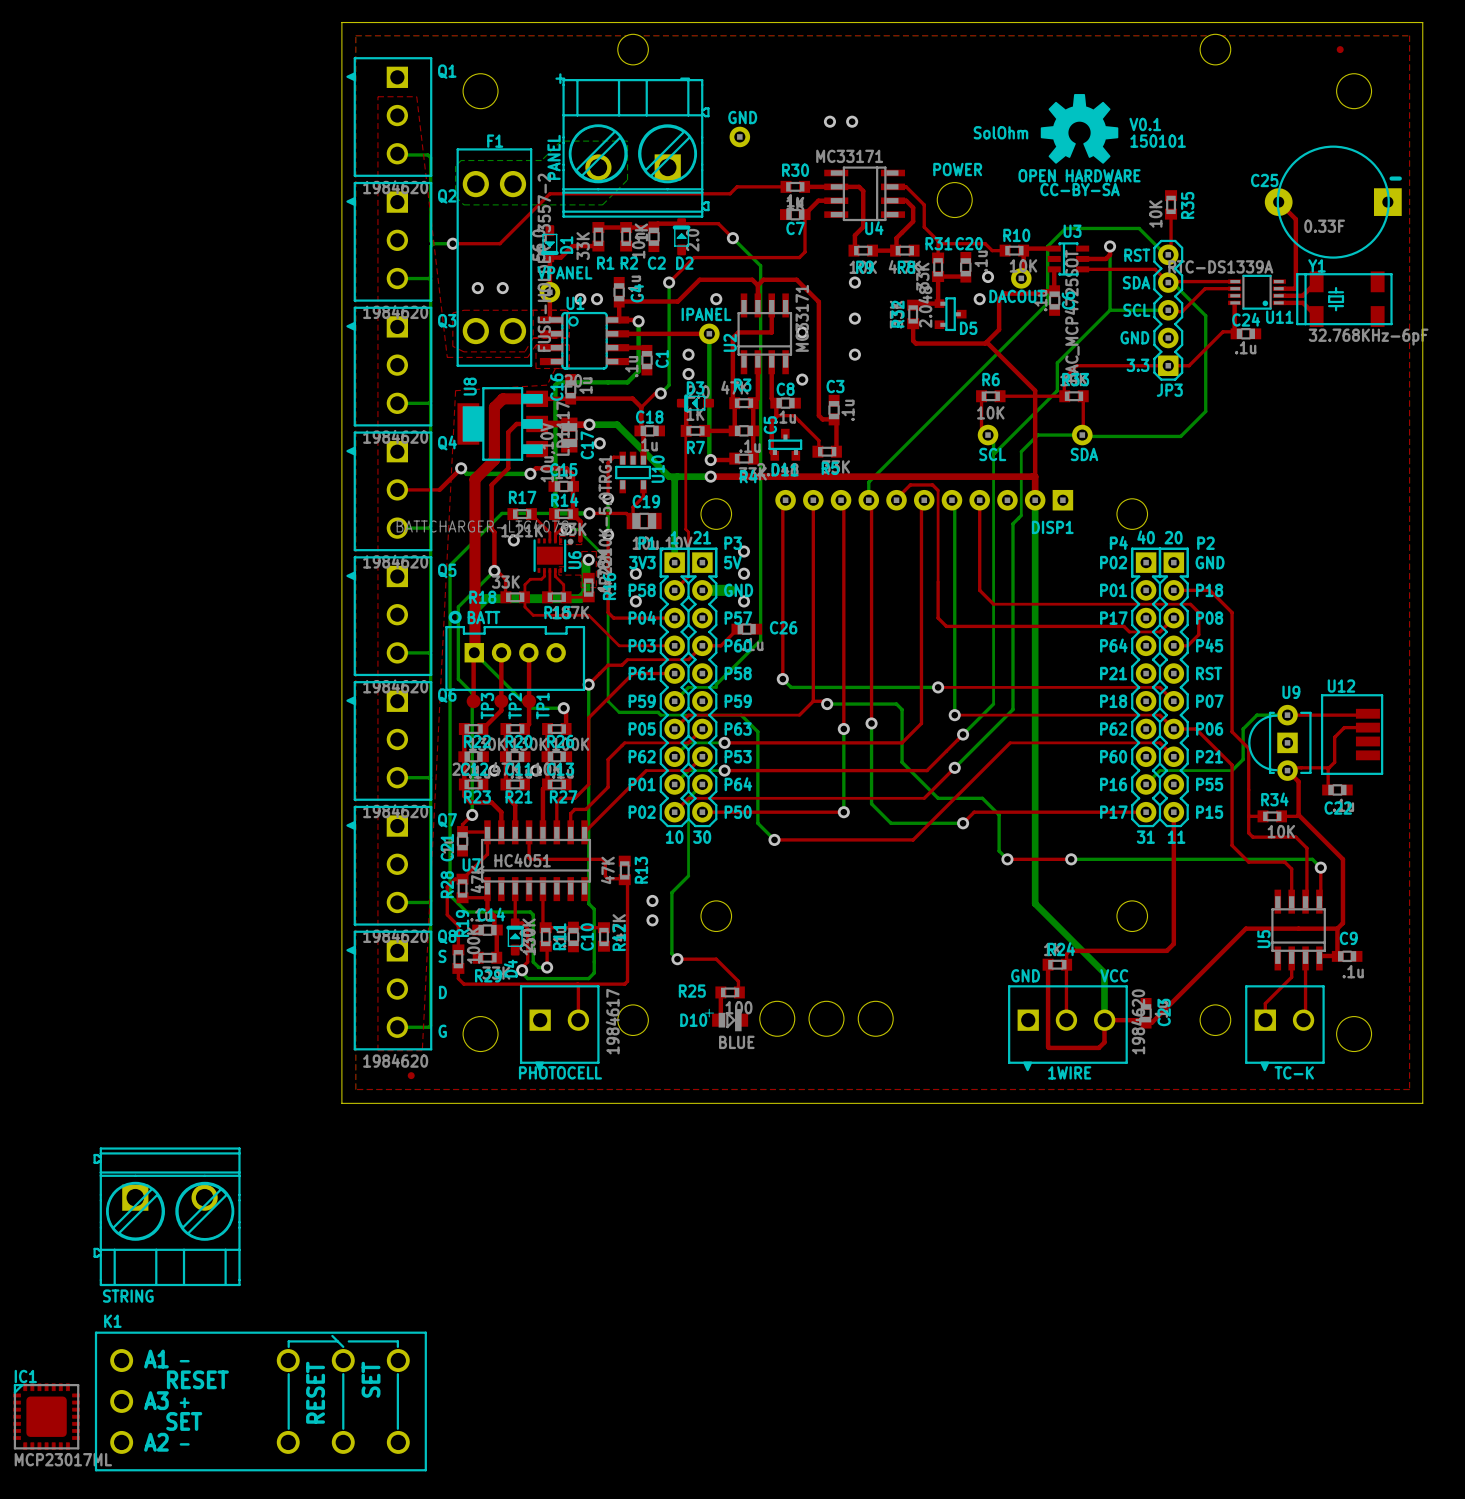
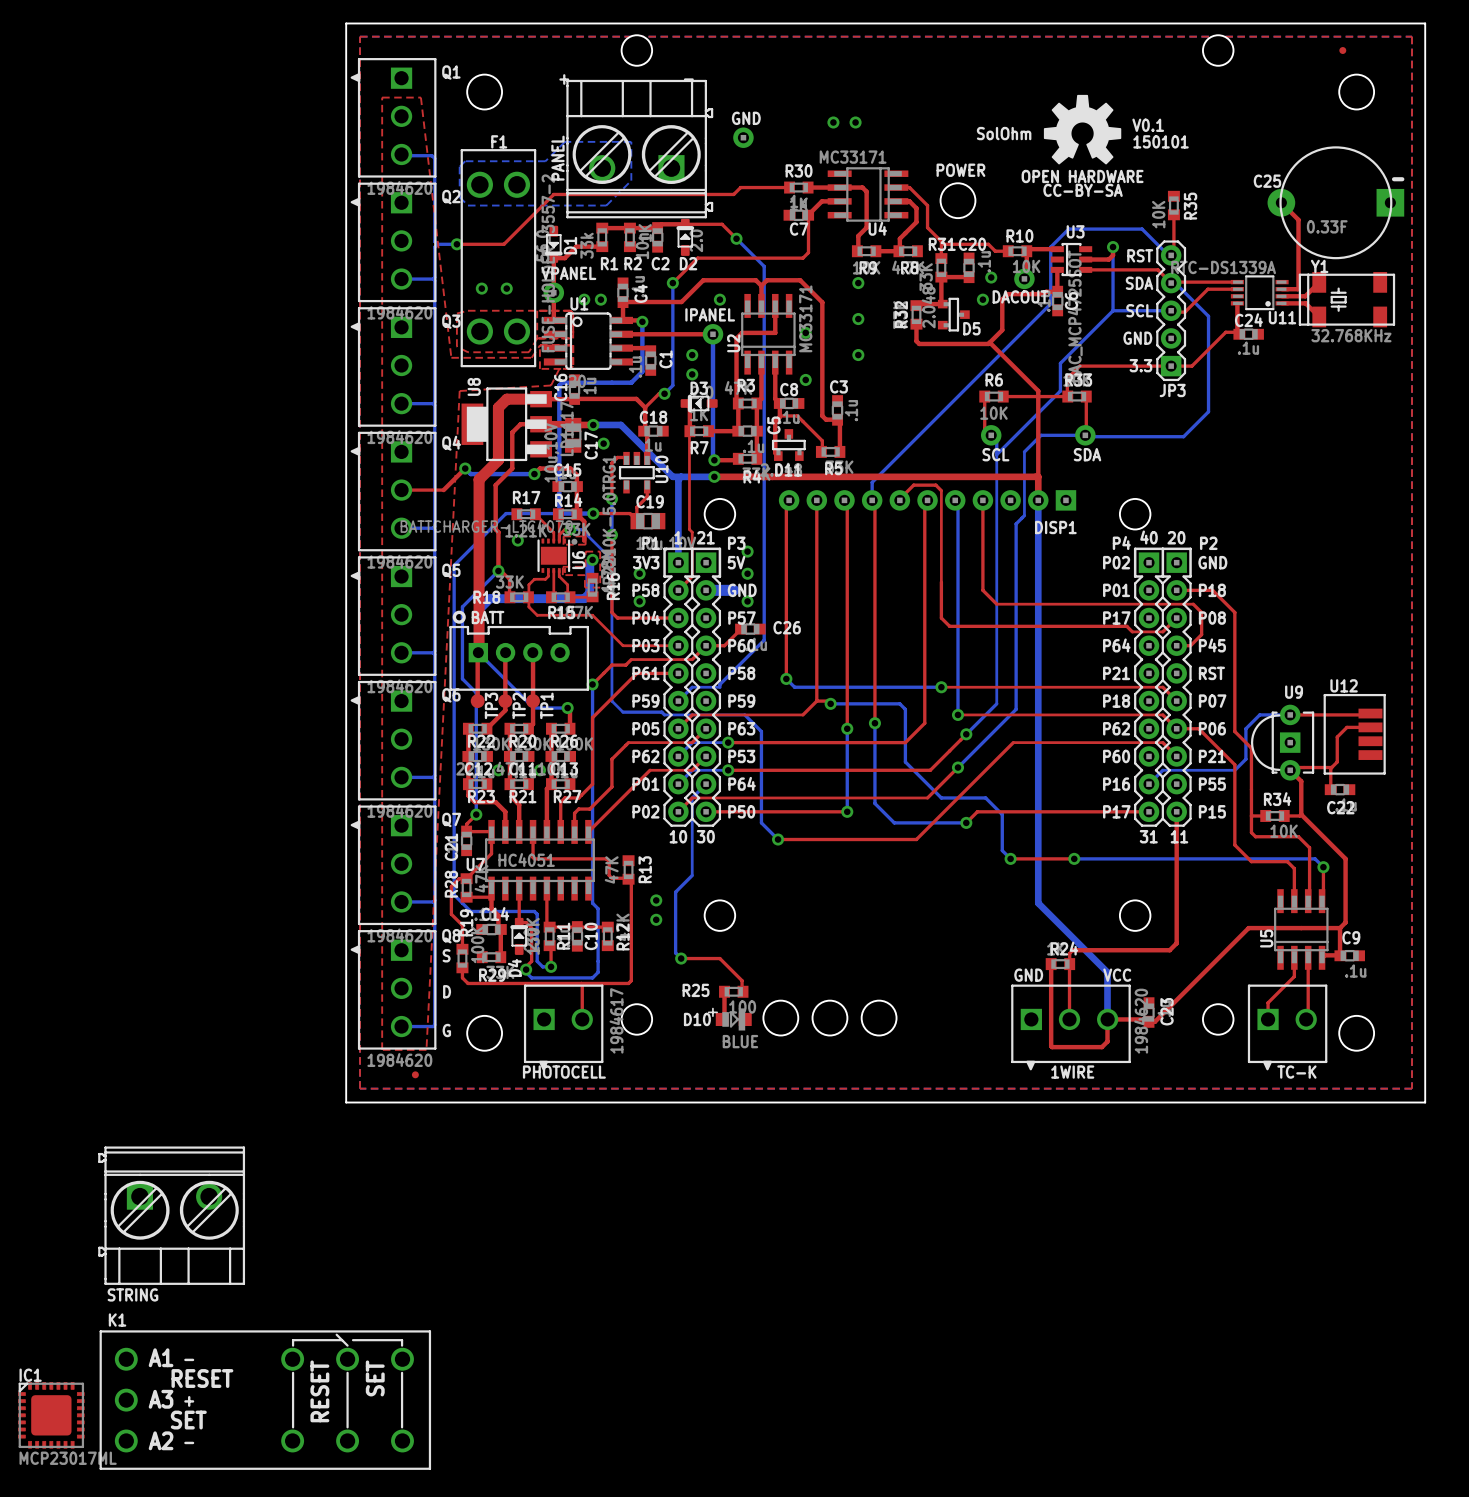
R1 value: 33K (583, 246) -> 33k (587, 245)
Y1 value: 32.768KHz-6pF (1368, 337) -> 32.768KHz (1351, 335)

